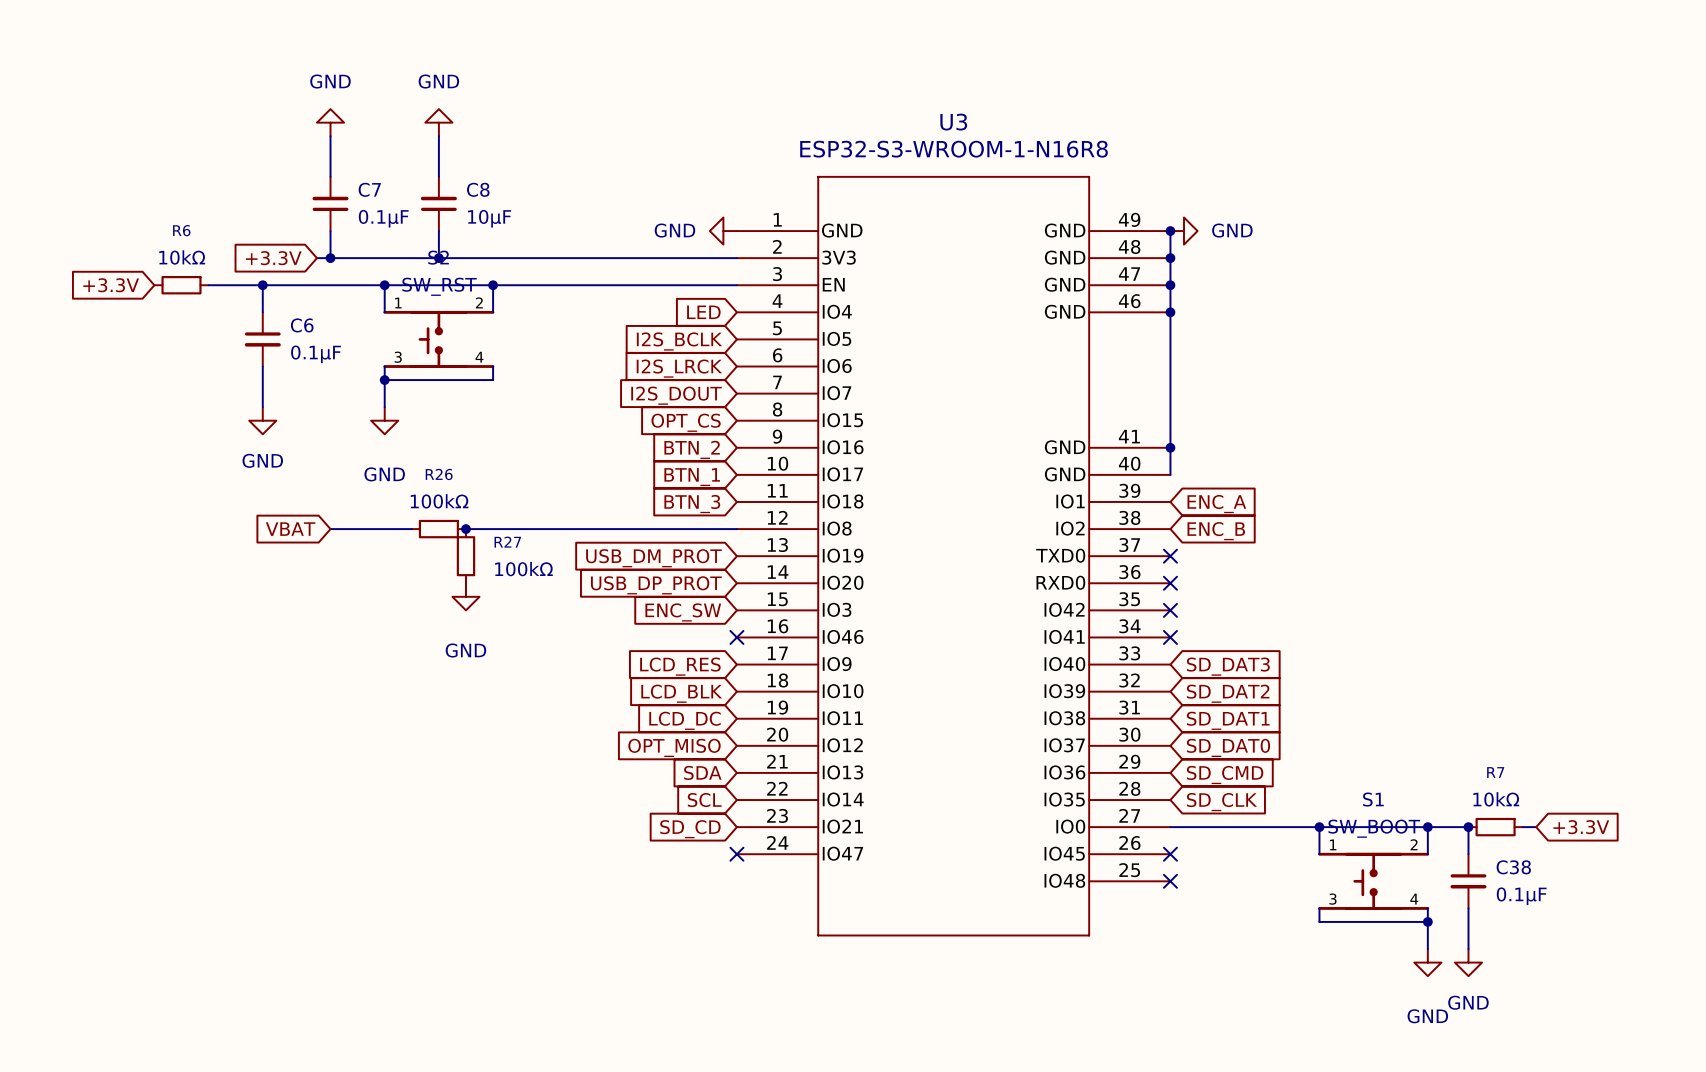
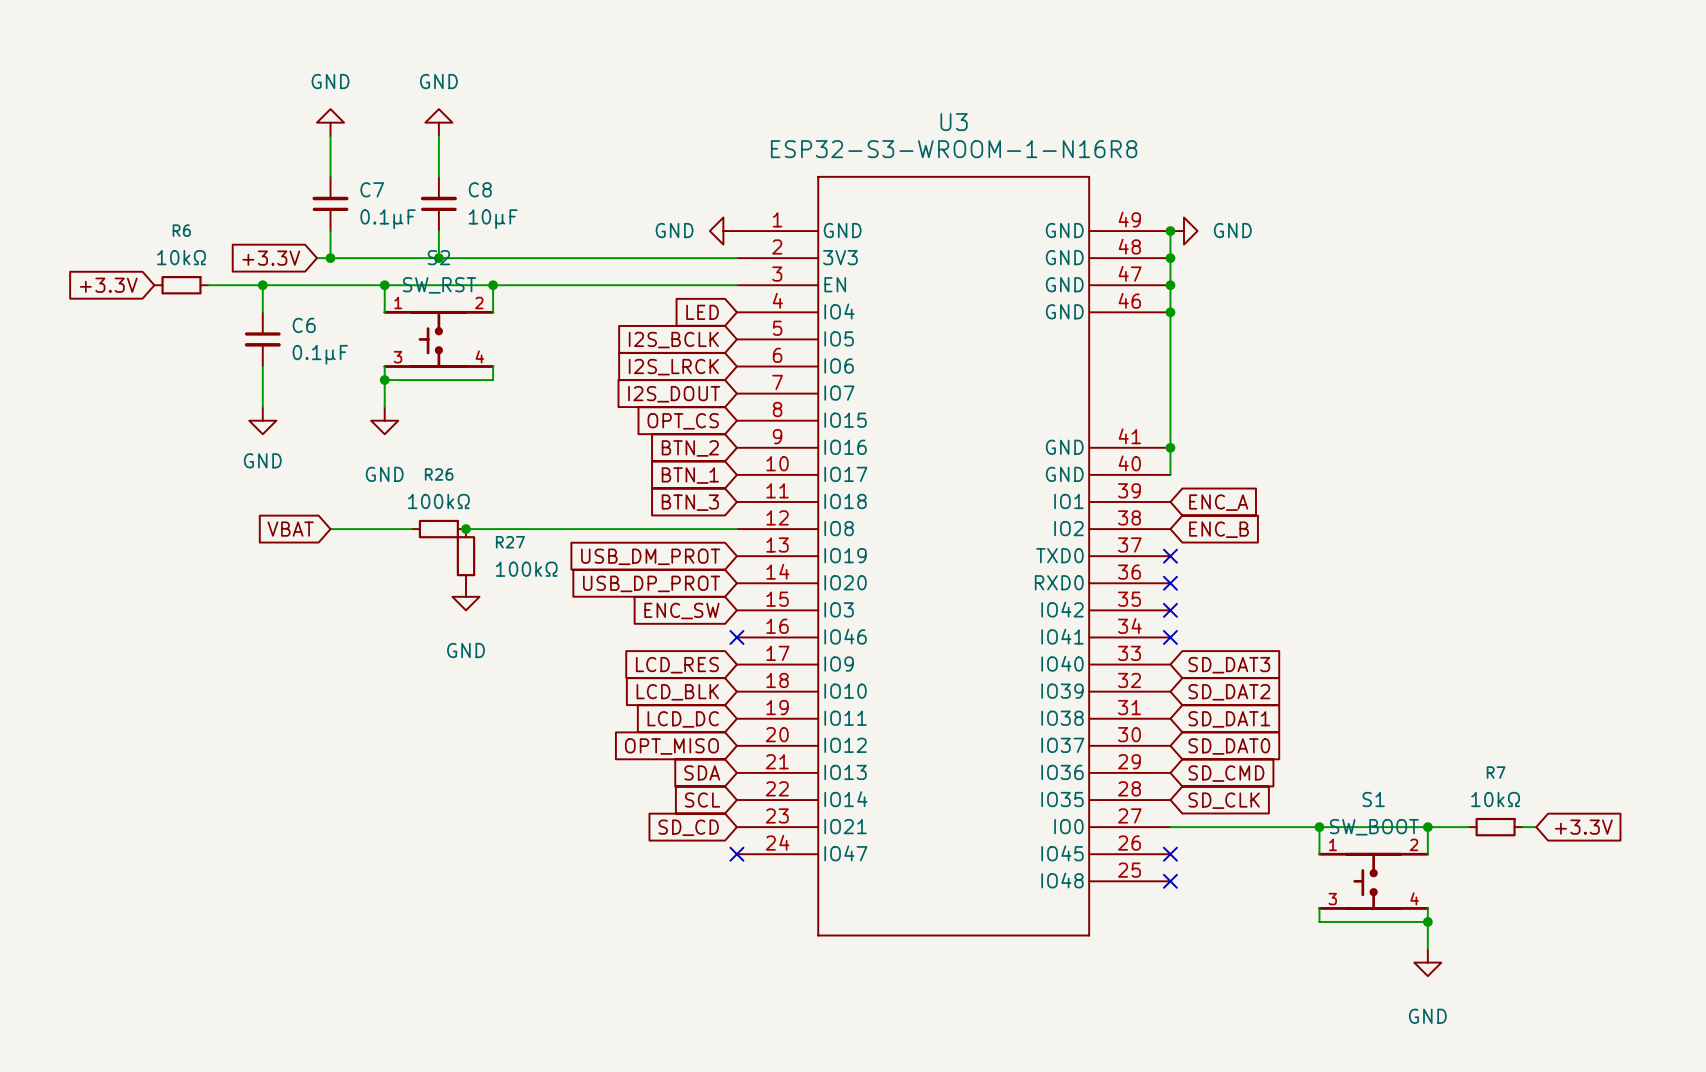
wire: (1468, 827) (1468, 854) -> none
junction: (1468, 827) -> none
C38: 0.1μF (1468, 881) -> none
wire: (1468, 908) (1468, 949) -> none
power symbol: GND (1468, 962) -> none

